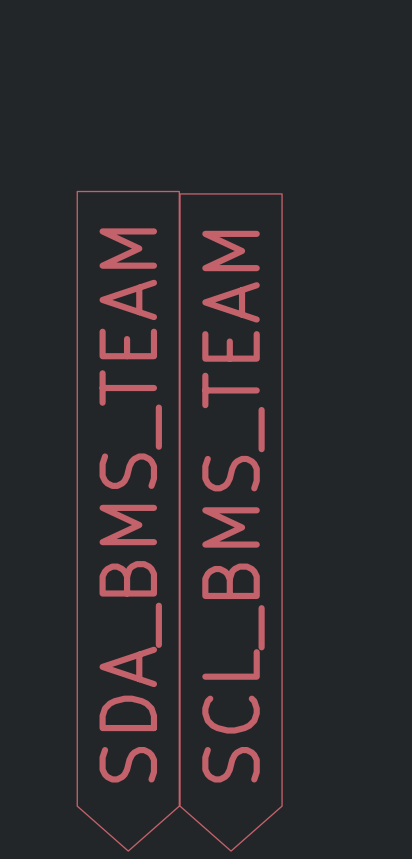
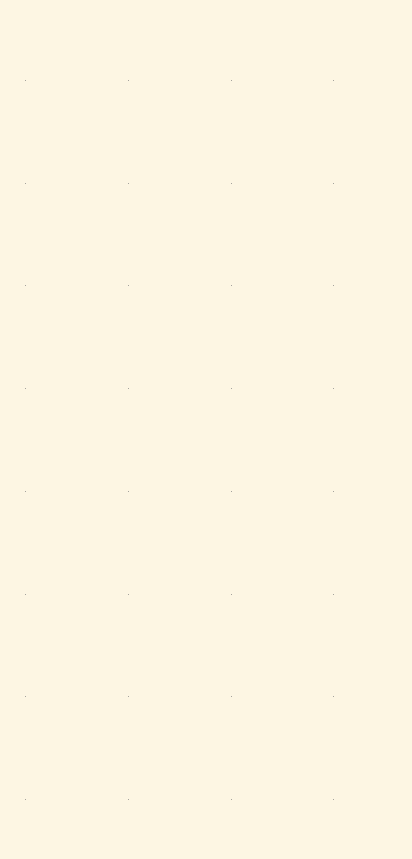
global label: SDA_BMS_TEAM (130, 505) -> none
global label: SCL_BMS_TEAM (233, 506) -> none

